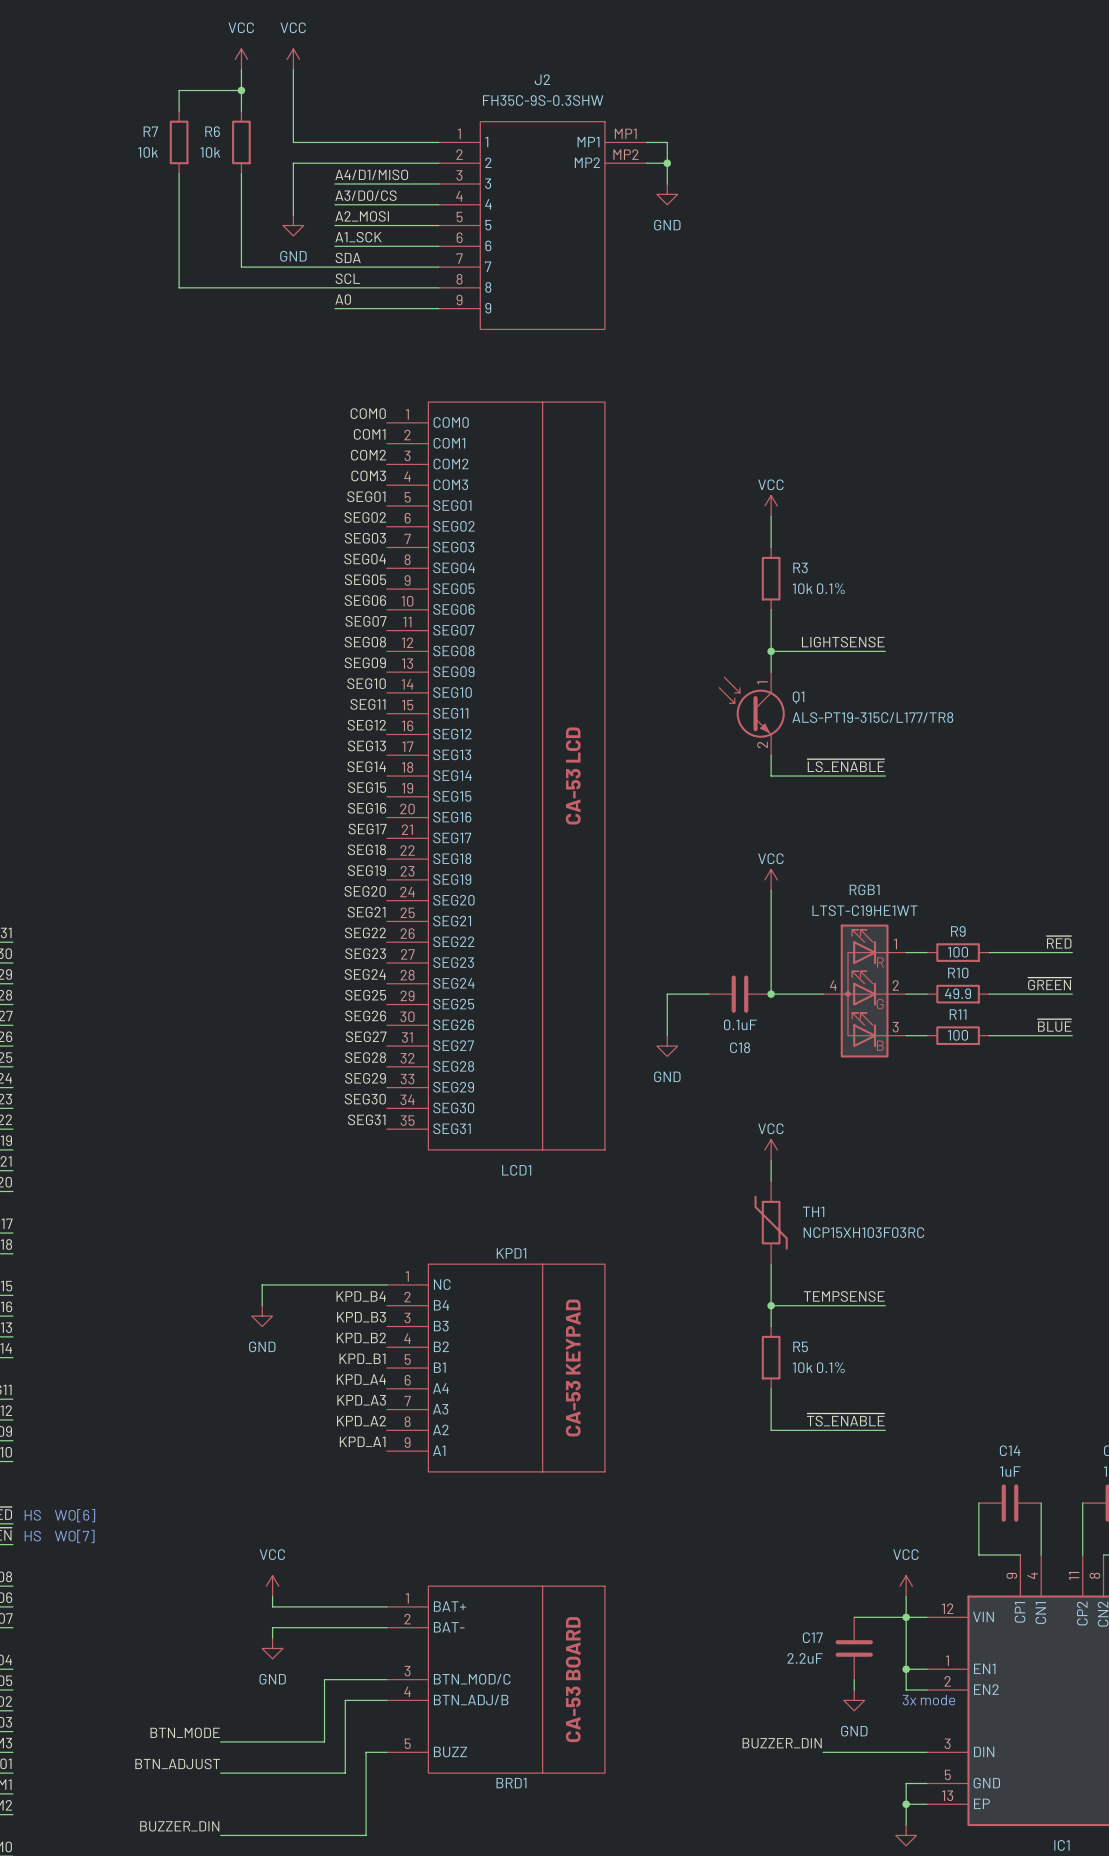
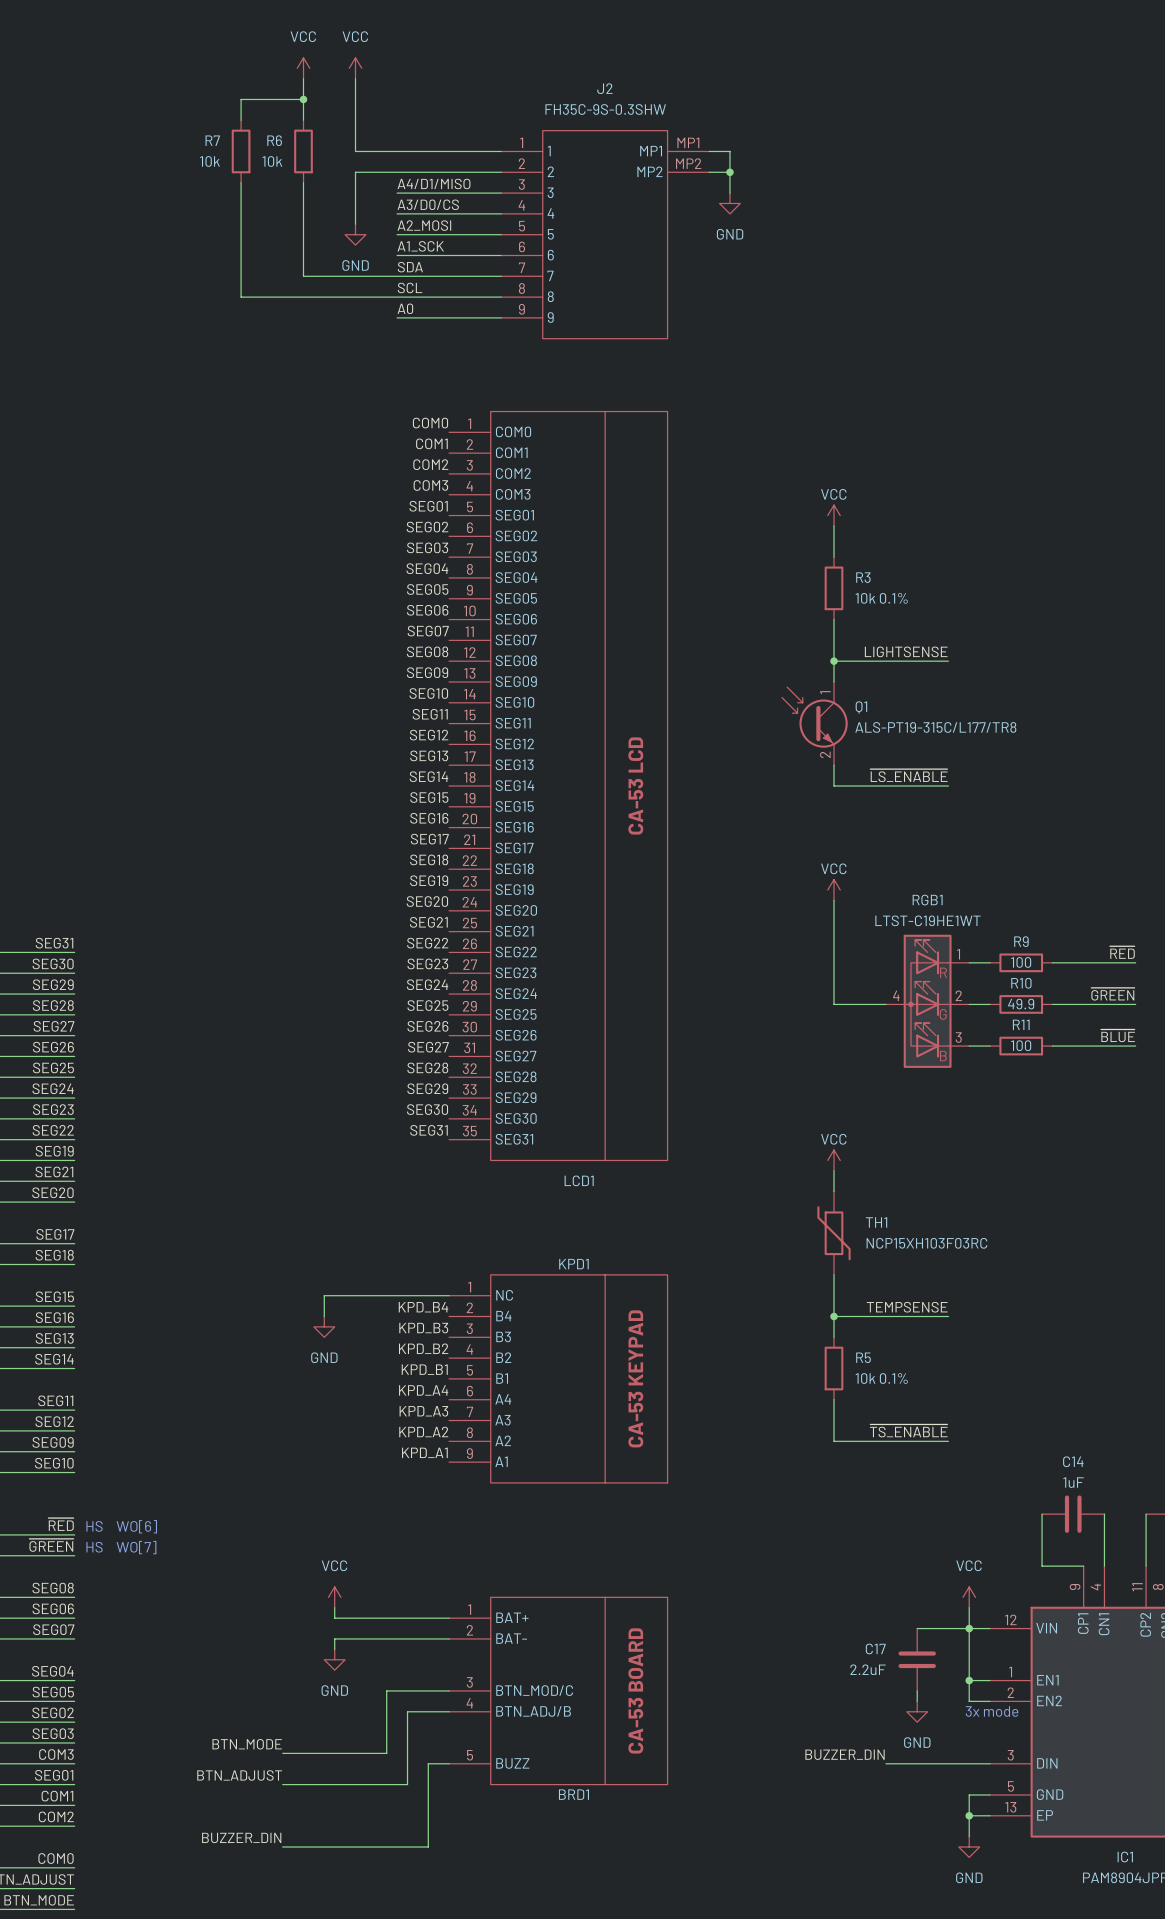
wire: (708, 994) (667, 994) (667, 1035) -> none
C18: 0.1uF (739, 994) -> none
junction: (771, 994) -> none
power symbol: GND (667, 1046) -> none

